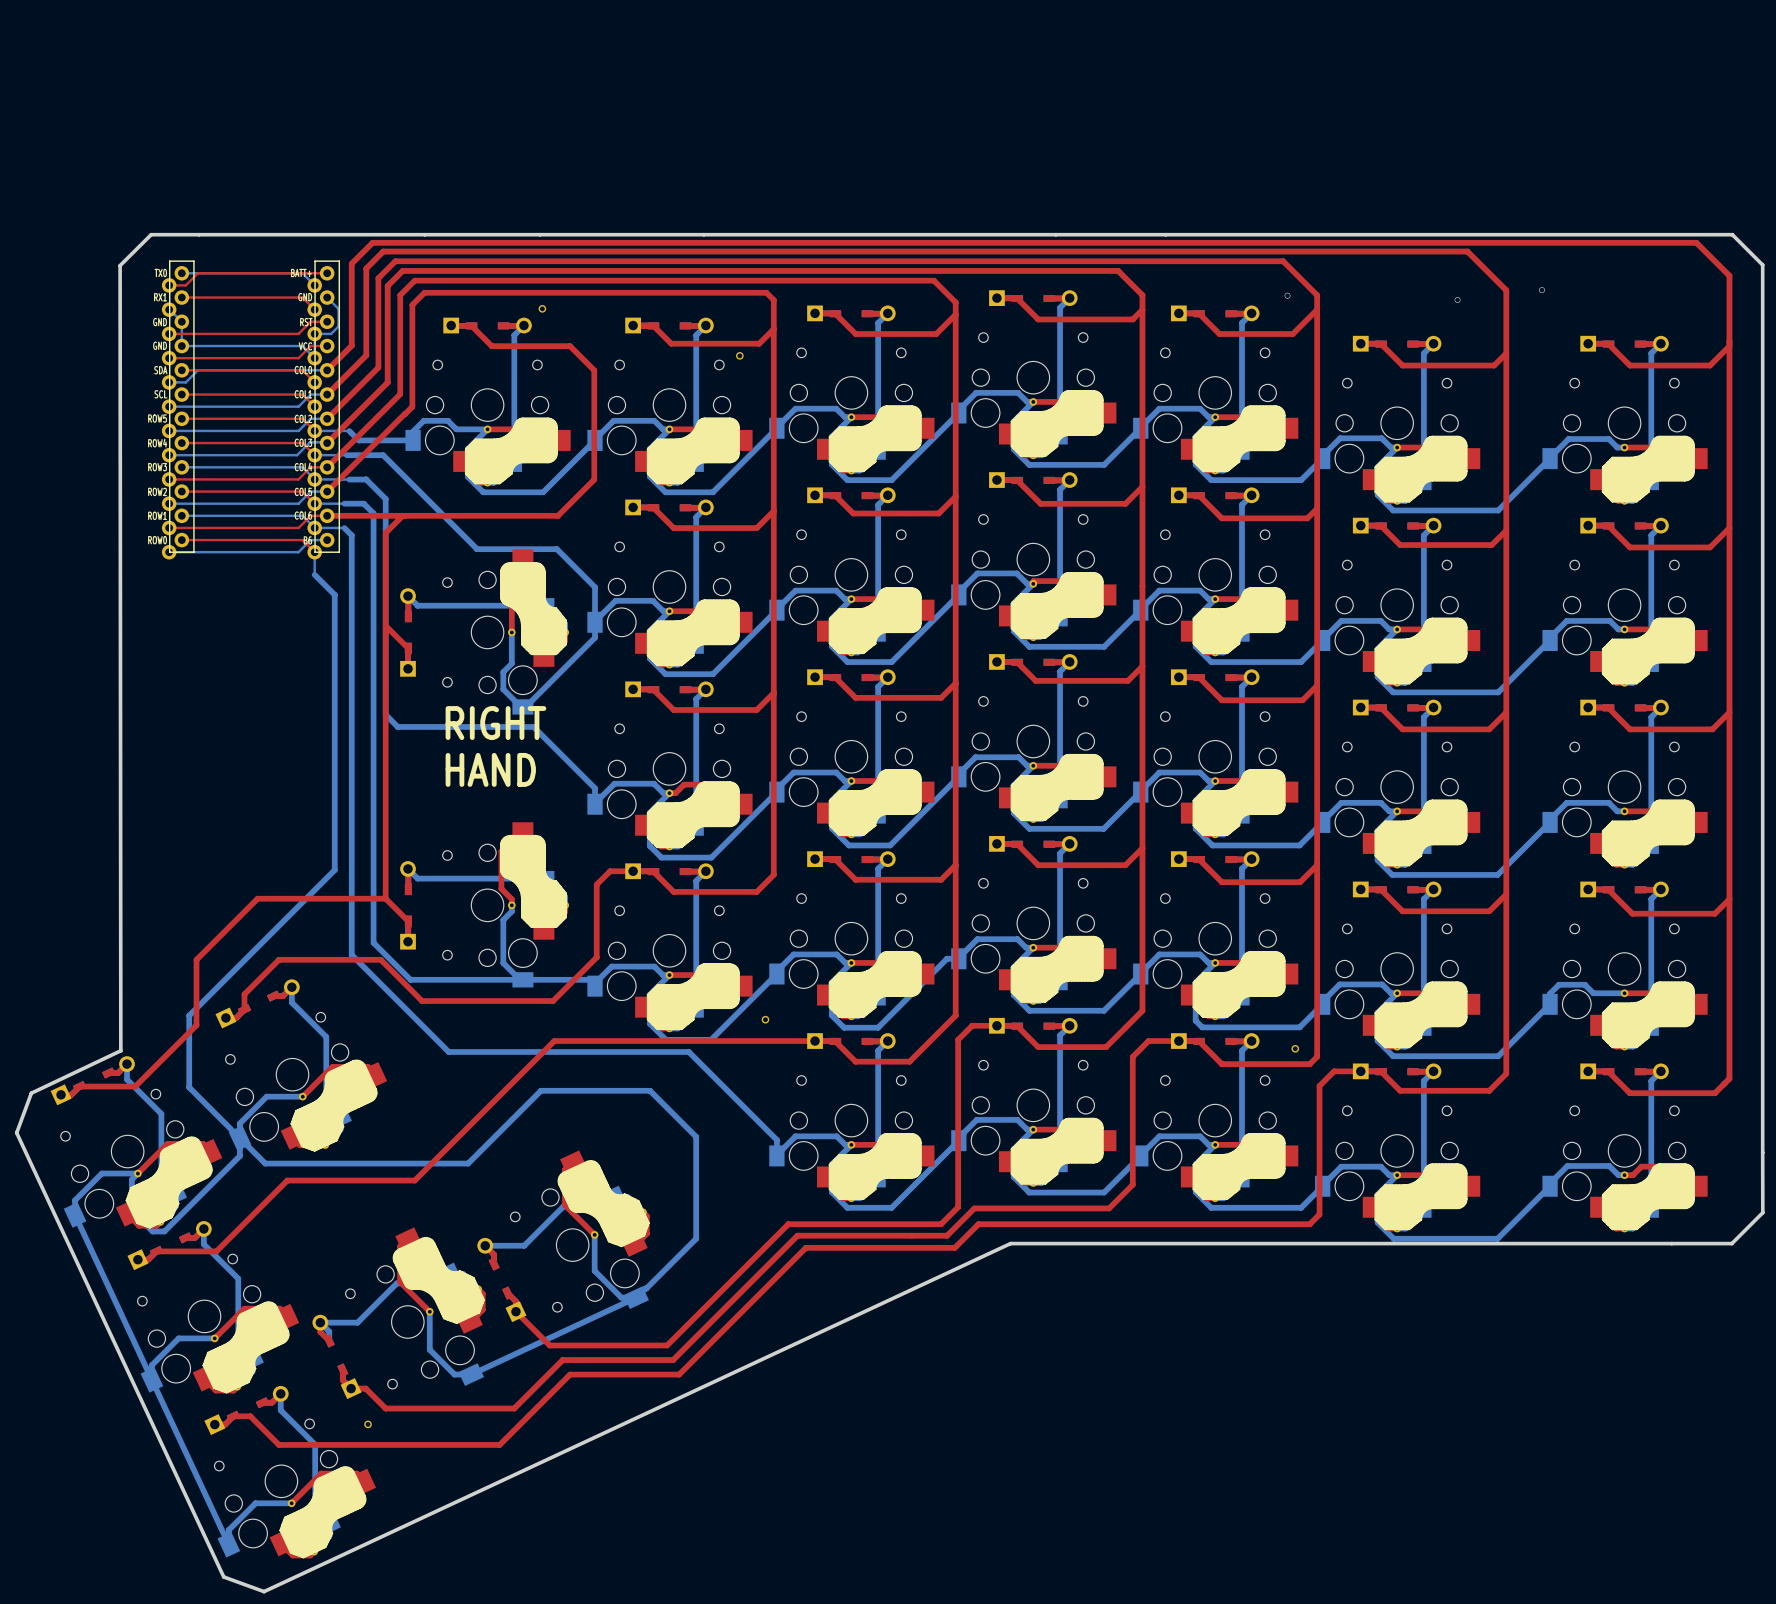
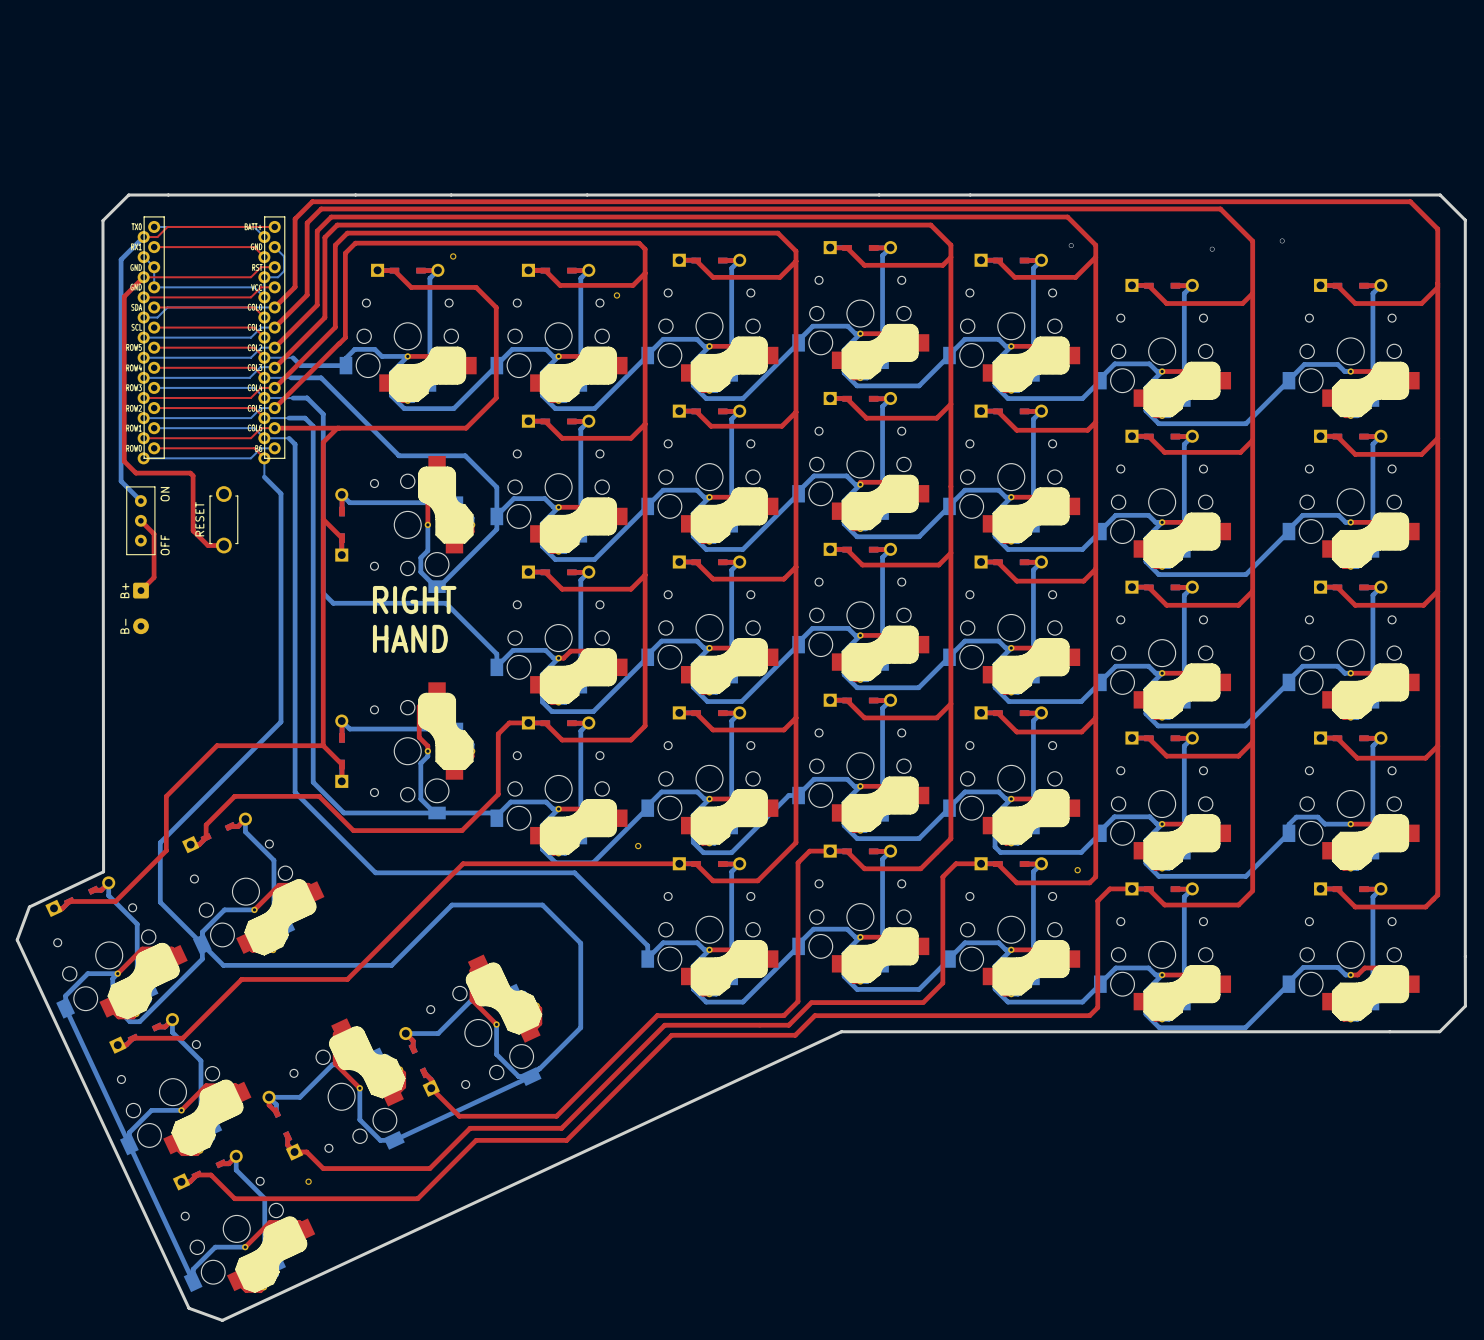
bottom track: none -> (143, 237) (121, 259) (121, 481) (140, 501)
top track: none -> (143, 277) (124, 296) (124, 461) (135, 473) (190, 473) (193, 475) (193, 530) (207, 545) (223, 545)
part: none -> (223, 519)
top track: none -> (140, 520) (154, 534) (154, 577) (140, 590)
part: none -> (140, 520)
part: none -> (140, 608)

